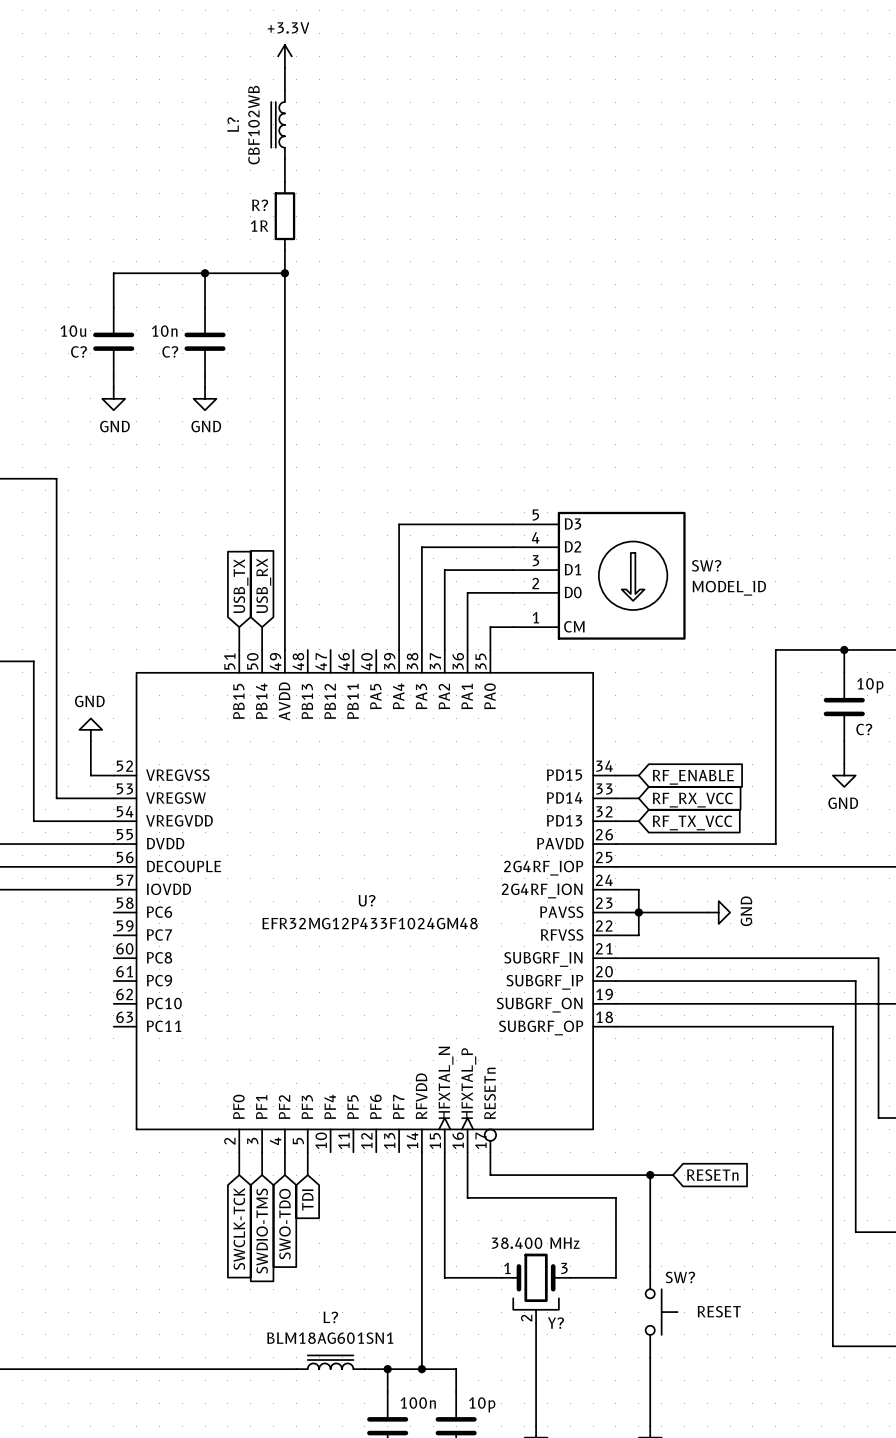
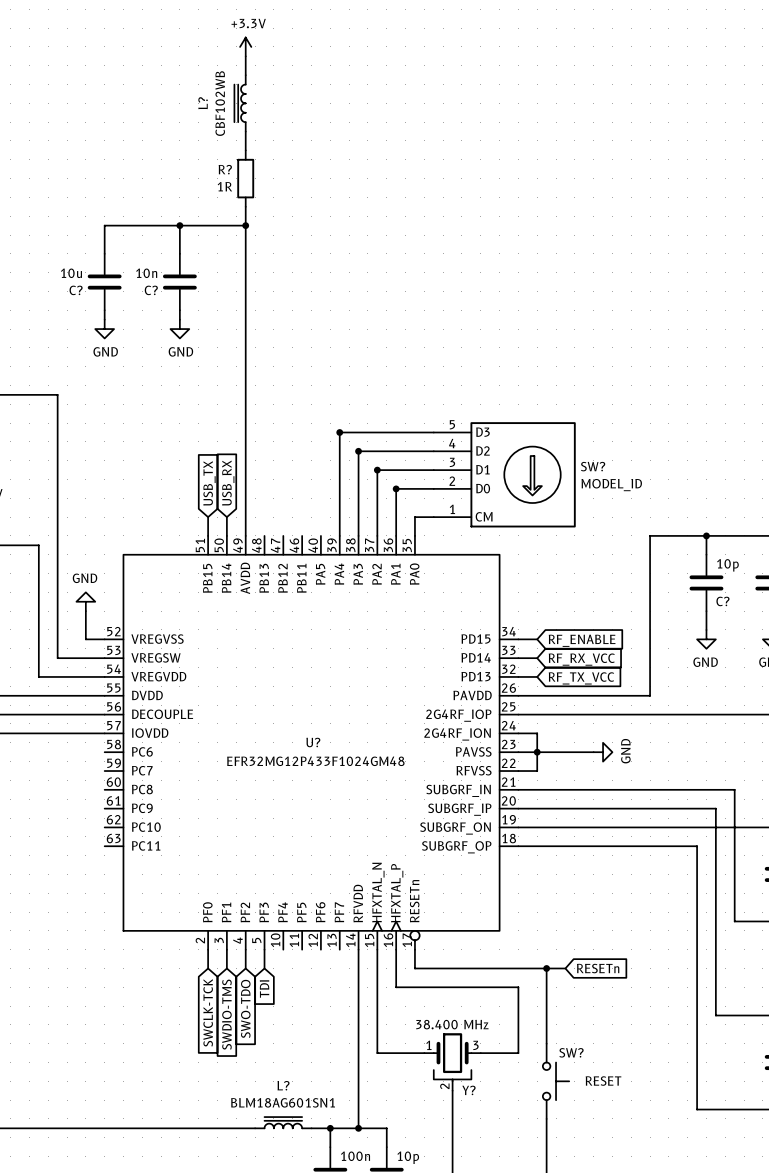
junction: none -> (339, 432)
junction: none -> (358, 451)
junction: none -> (377, 470)
junction: none -> (396, 488)

